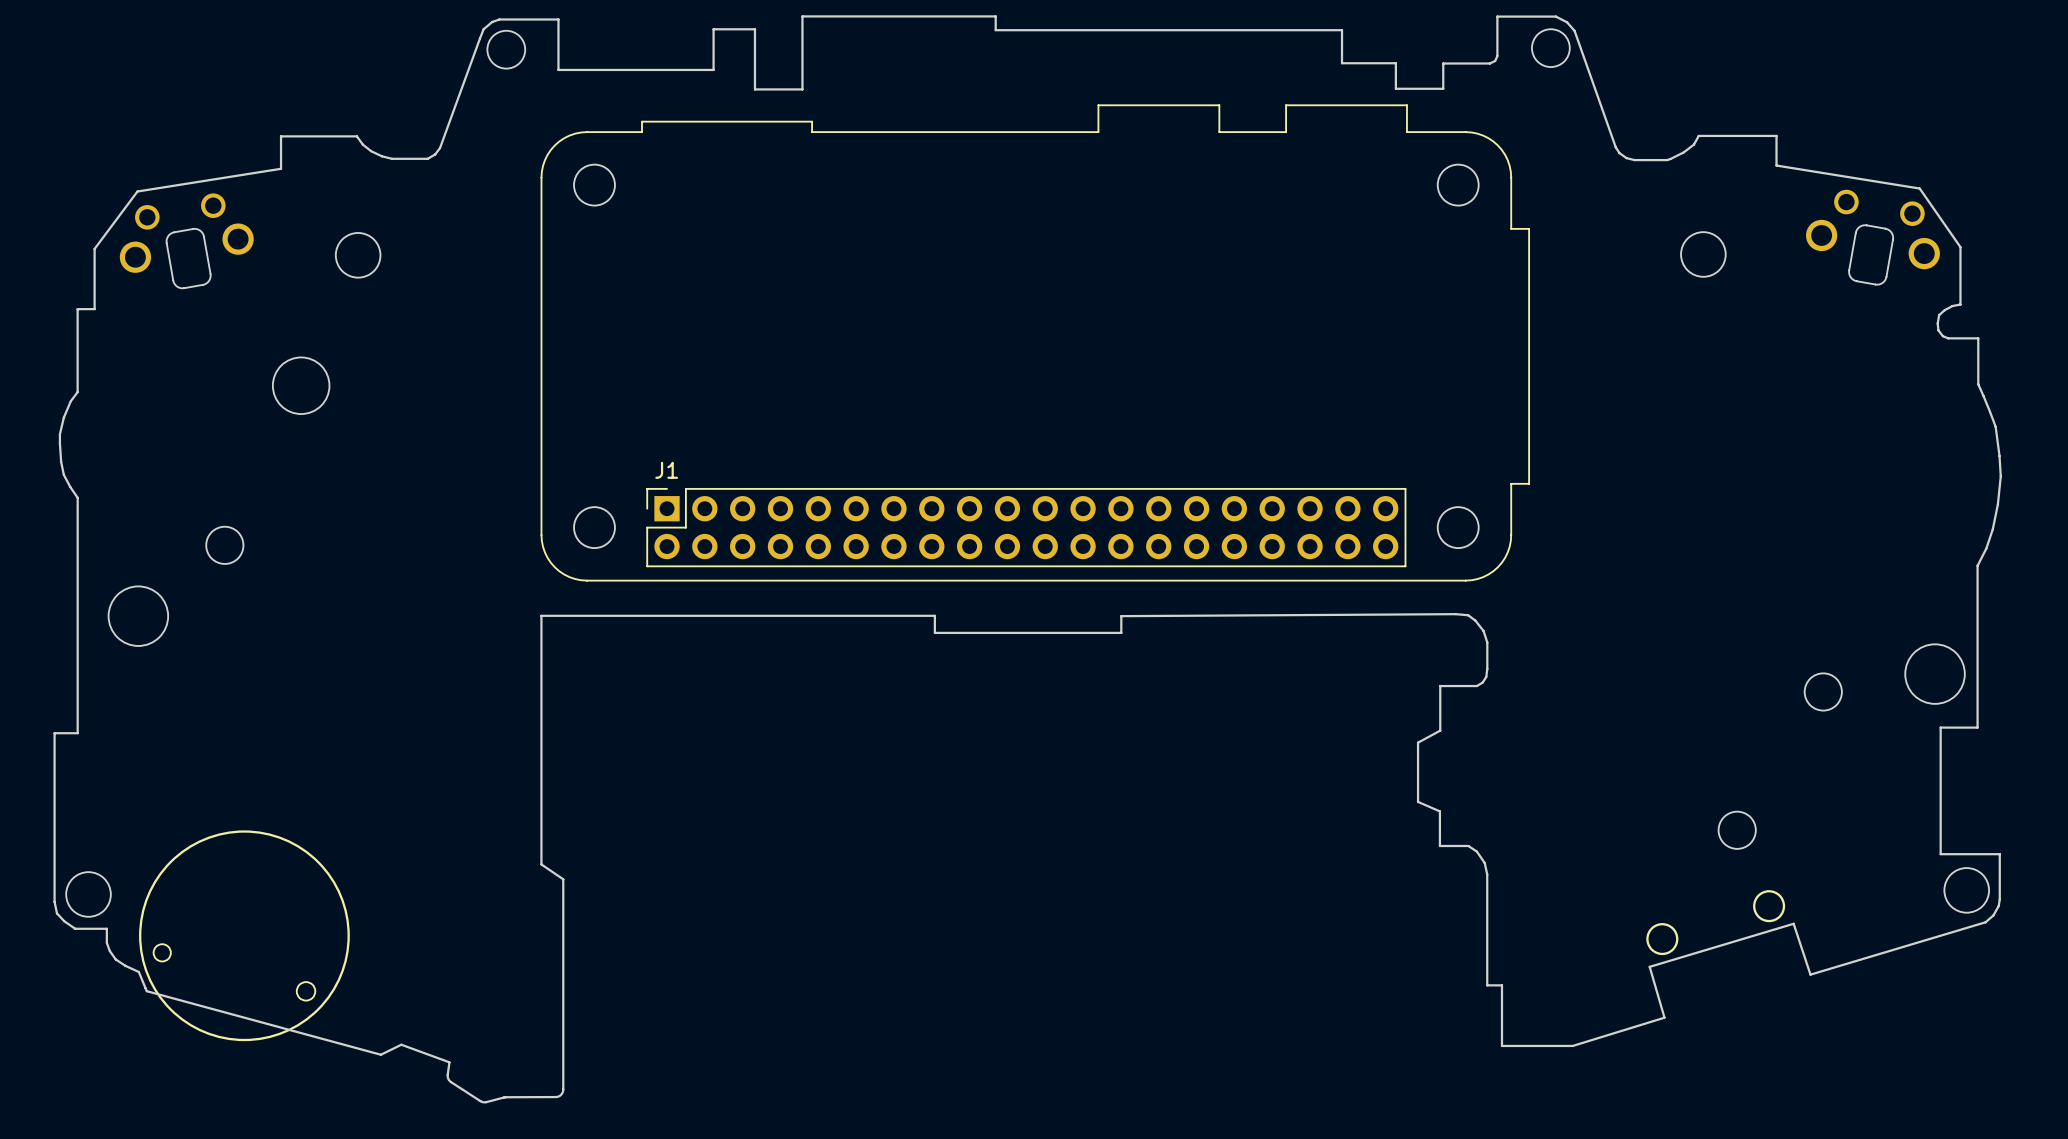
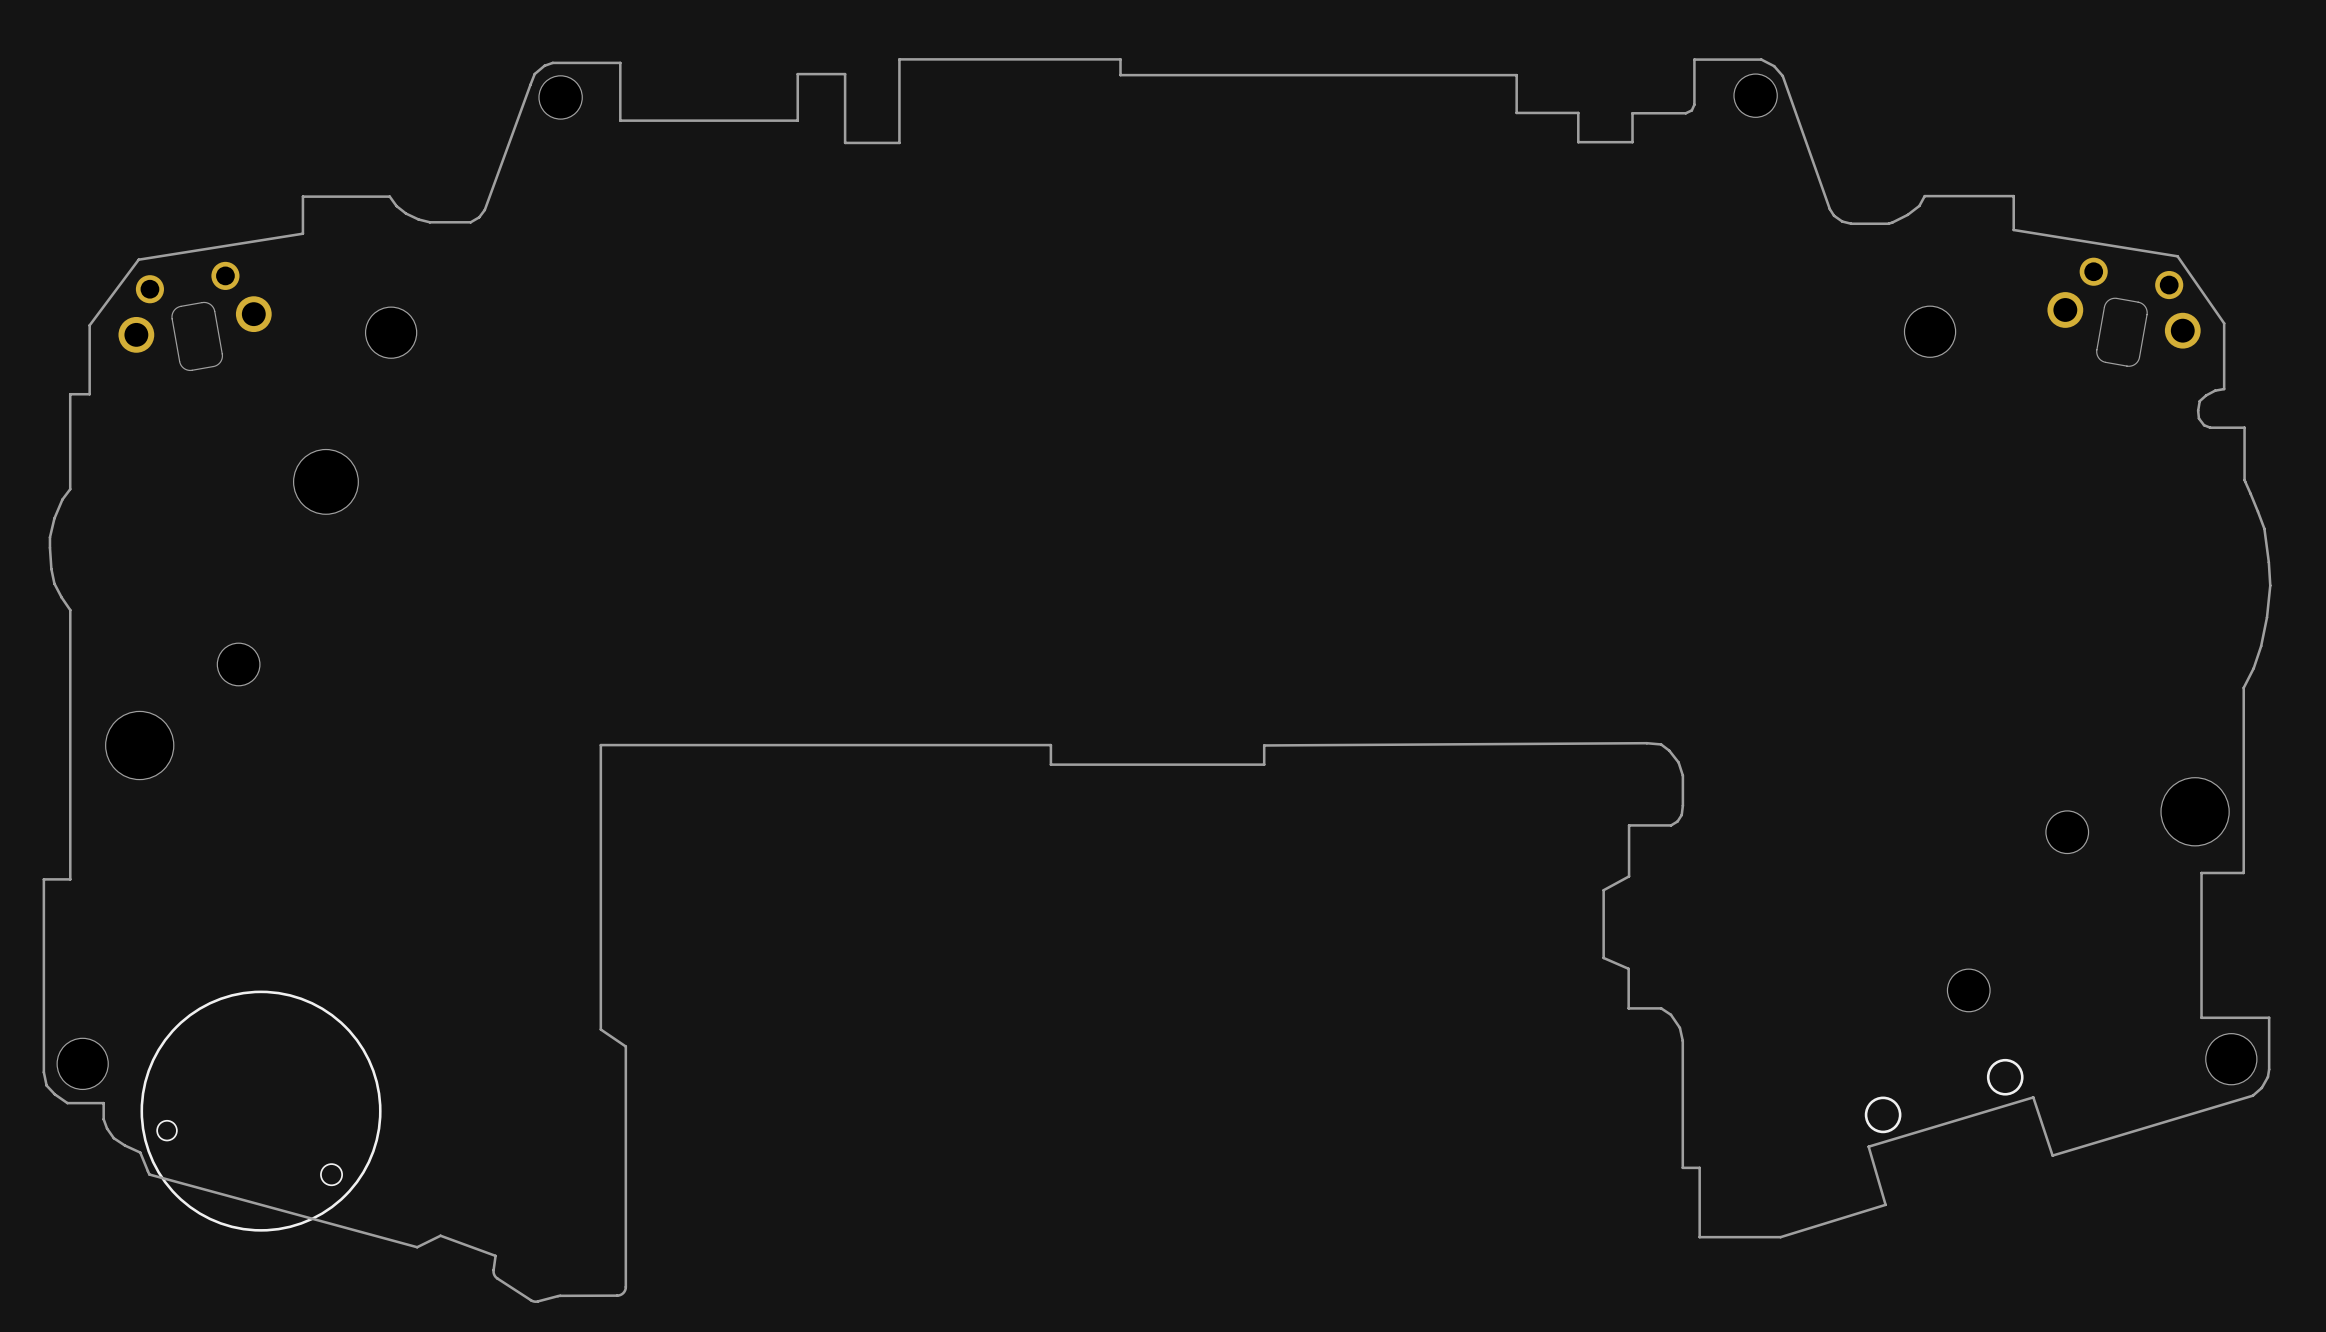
J1: (1035, 342) -> none

